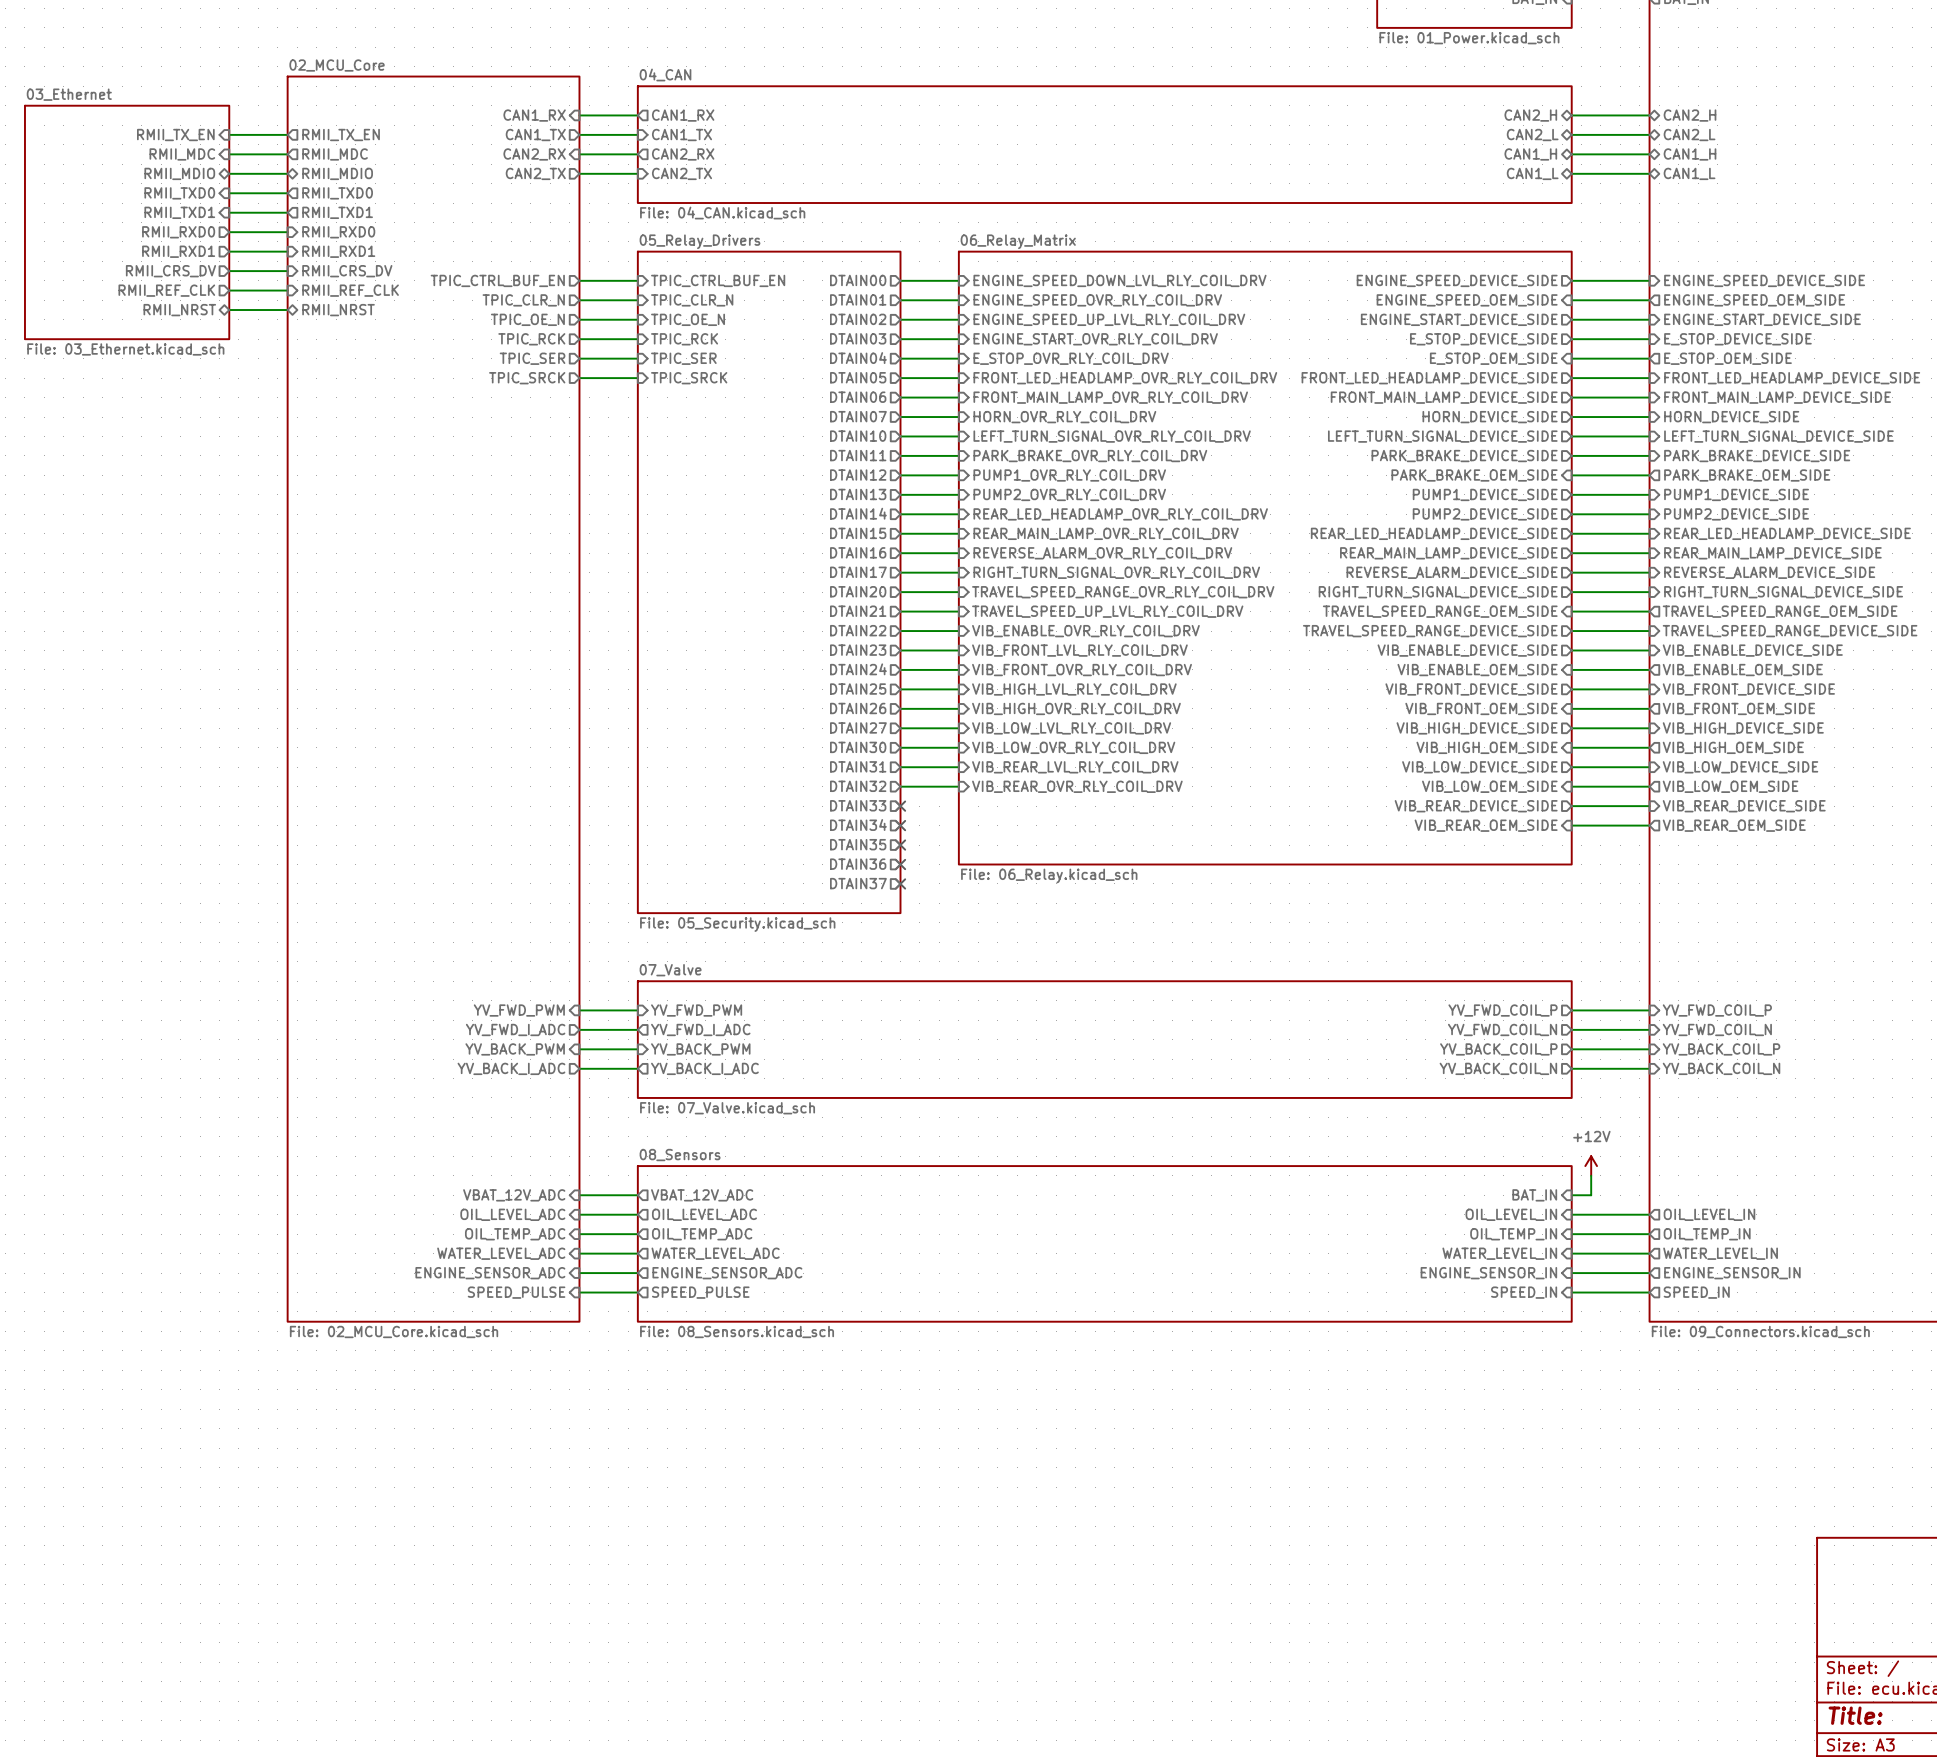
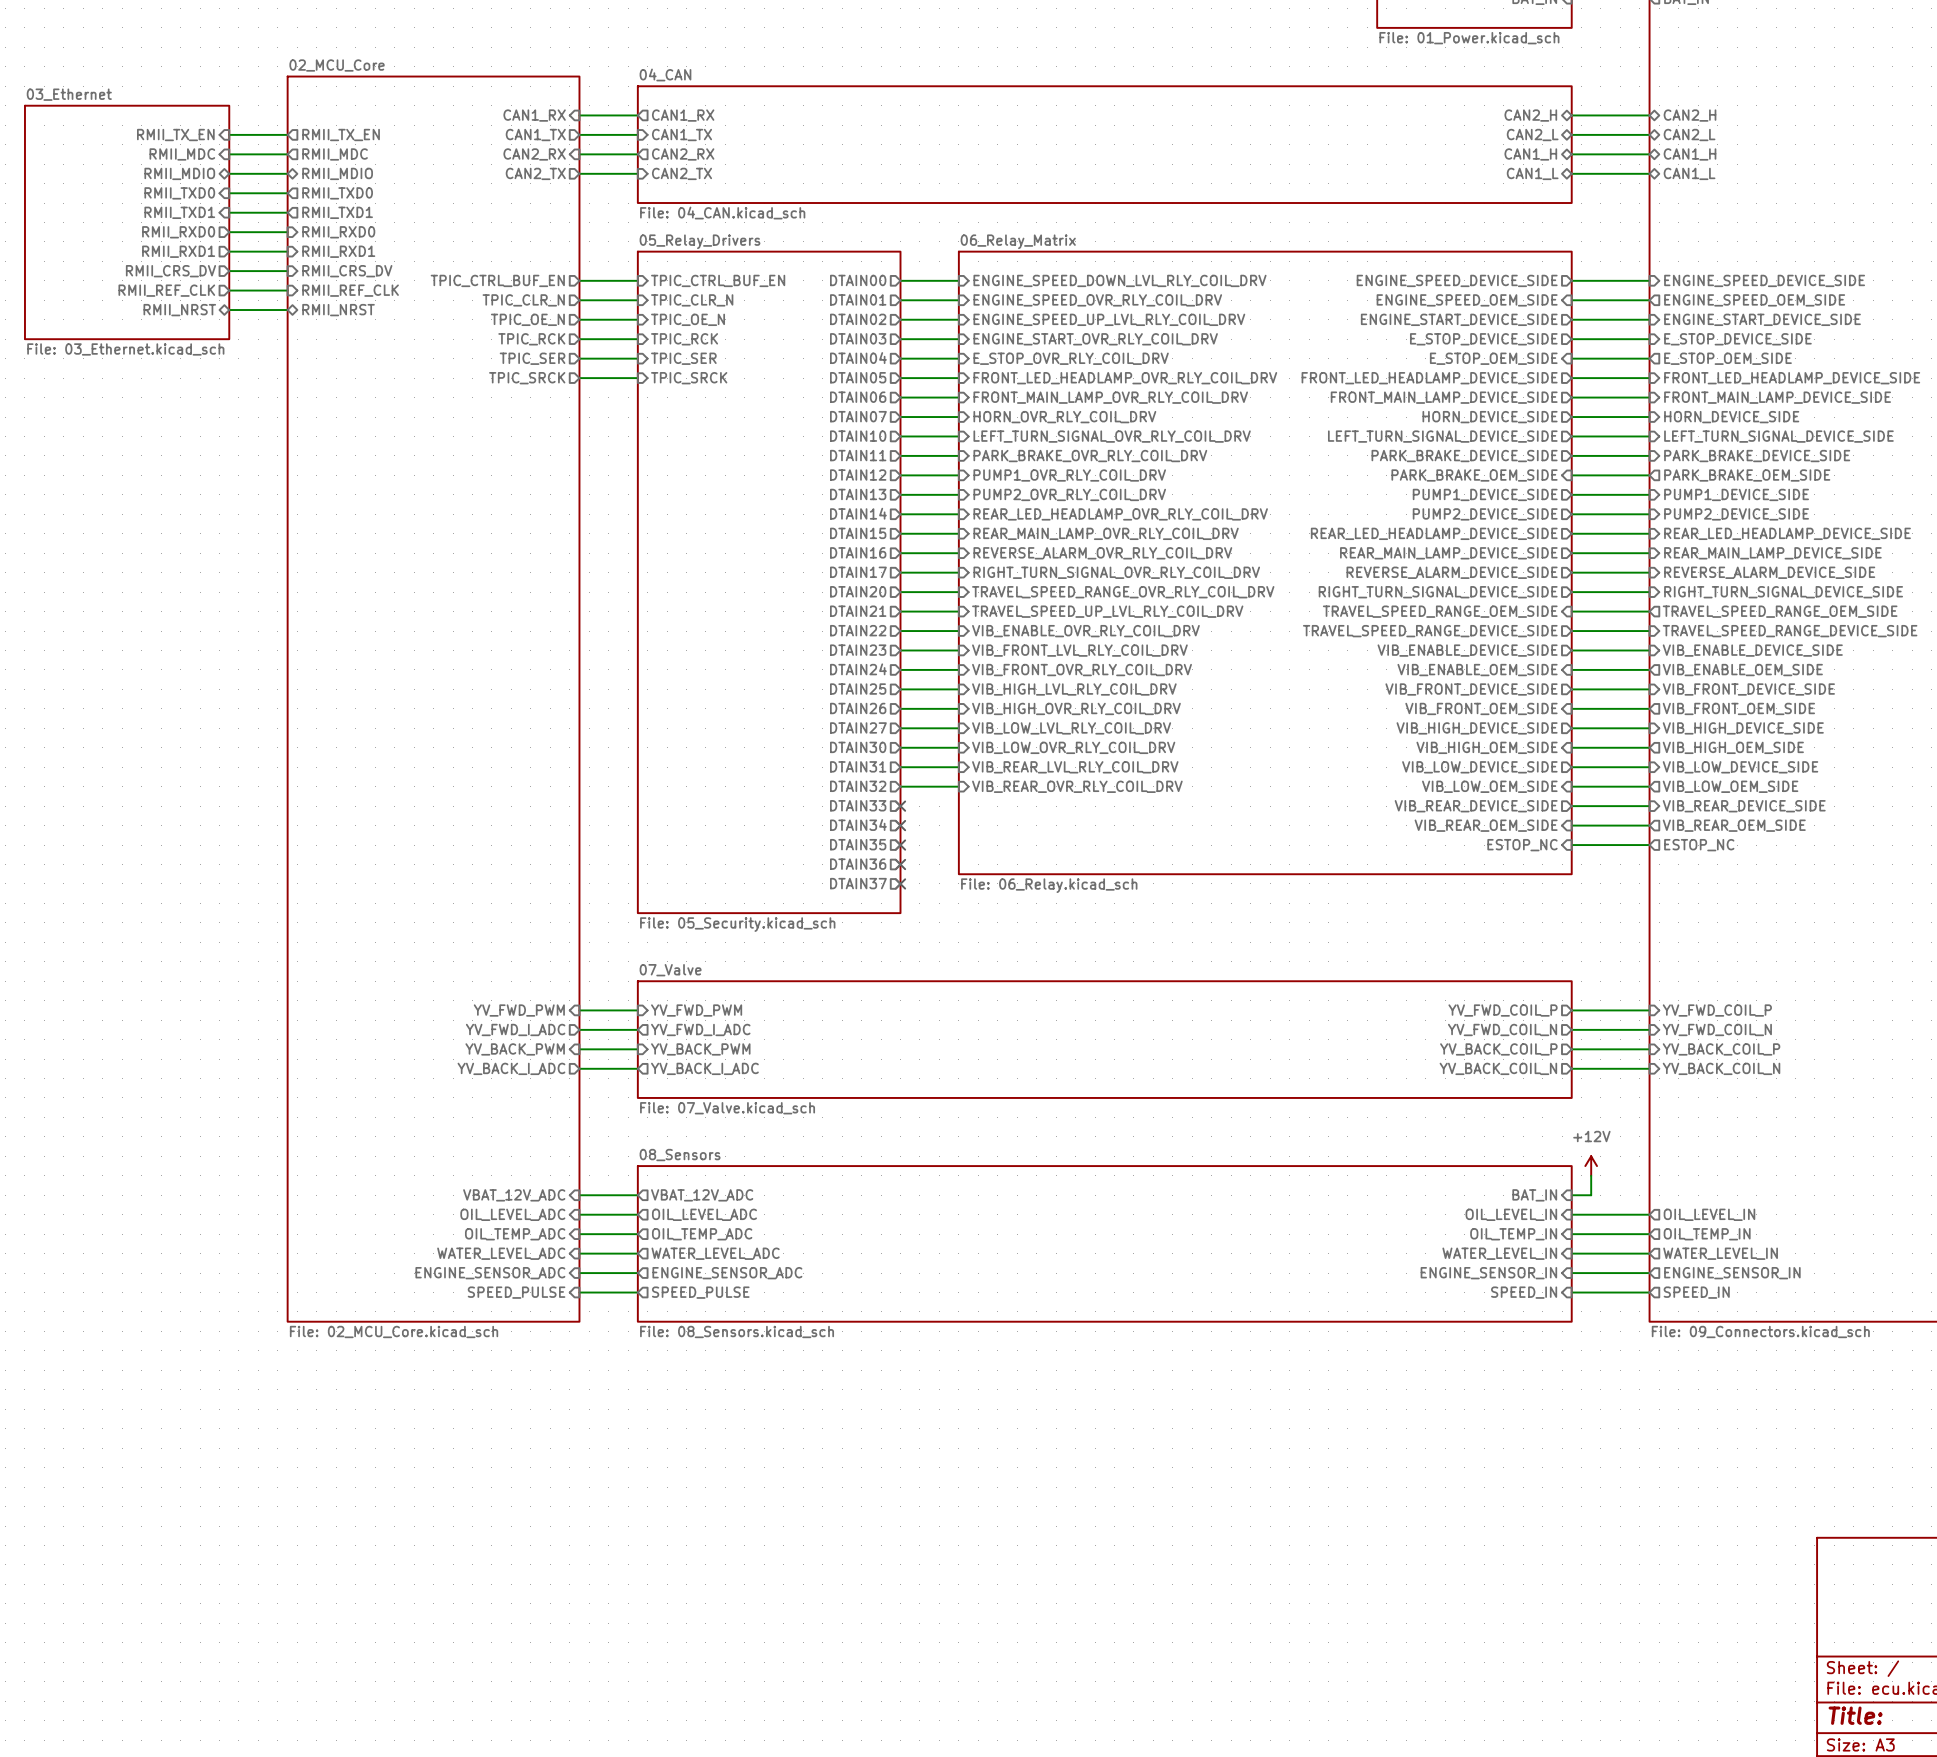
sheet 06_Relay_Matrix shape: [958, 251, 1573, 866] -> [958, 251, 1573, 875]
sheet pin: none -> ESTOP_NC (1522, 845)
wire: none -> (1571, 845) (1649, 845)
sheet pin: none -> ESTOP_NC (1699, 845)

